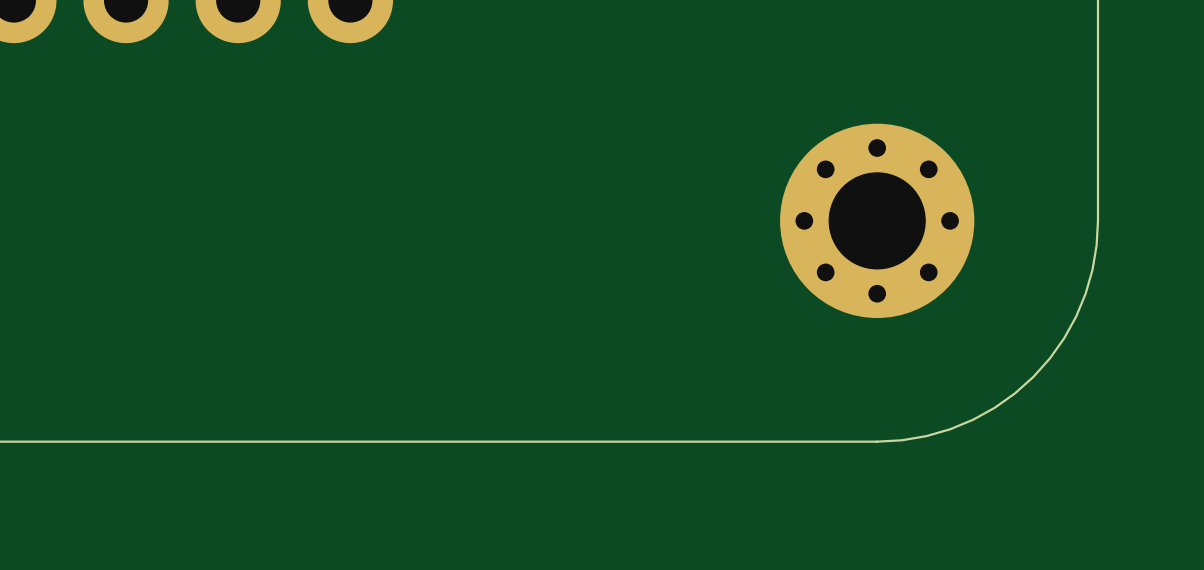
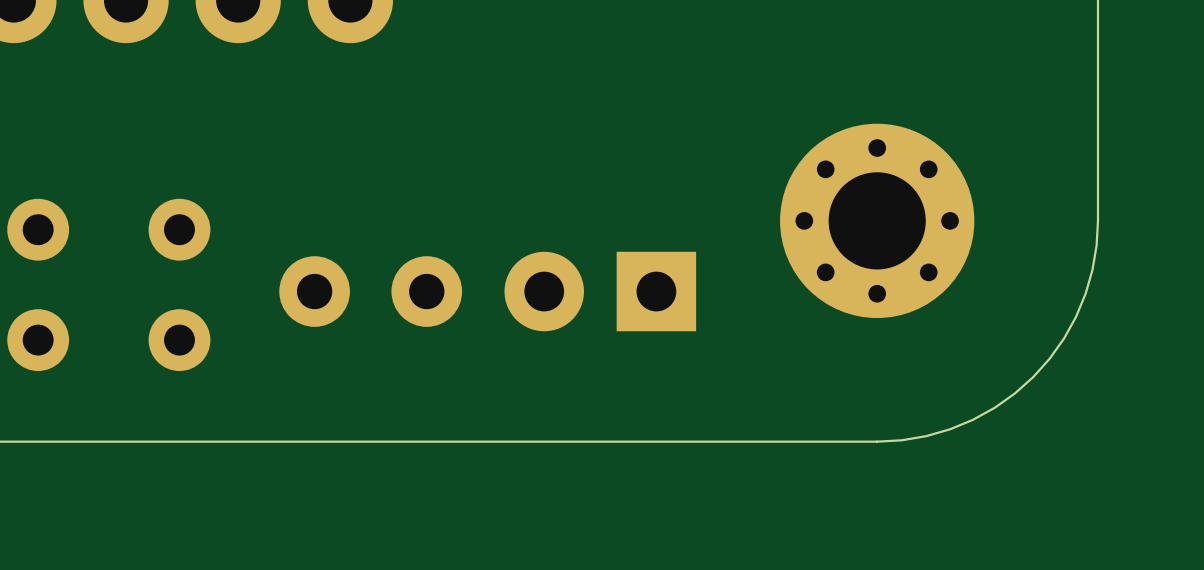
part: none -> (38, 284)
part: none -> (179, 284)
part: none -> (370, 291)
part: none -> (600, 291)

